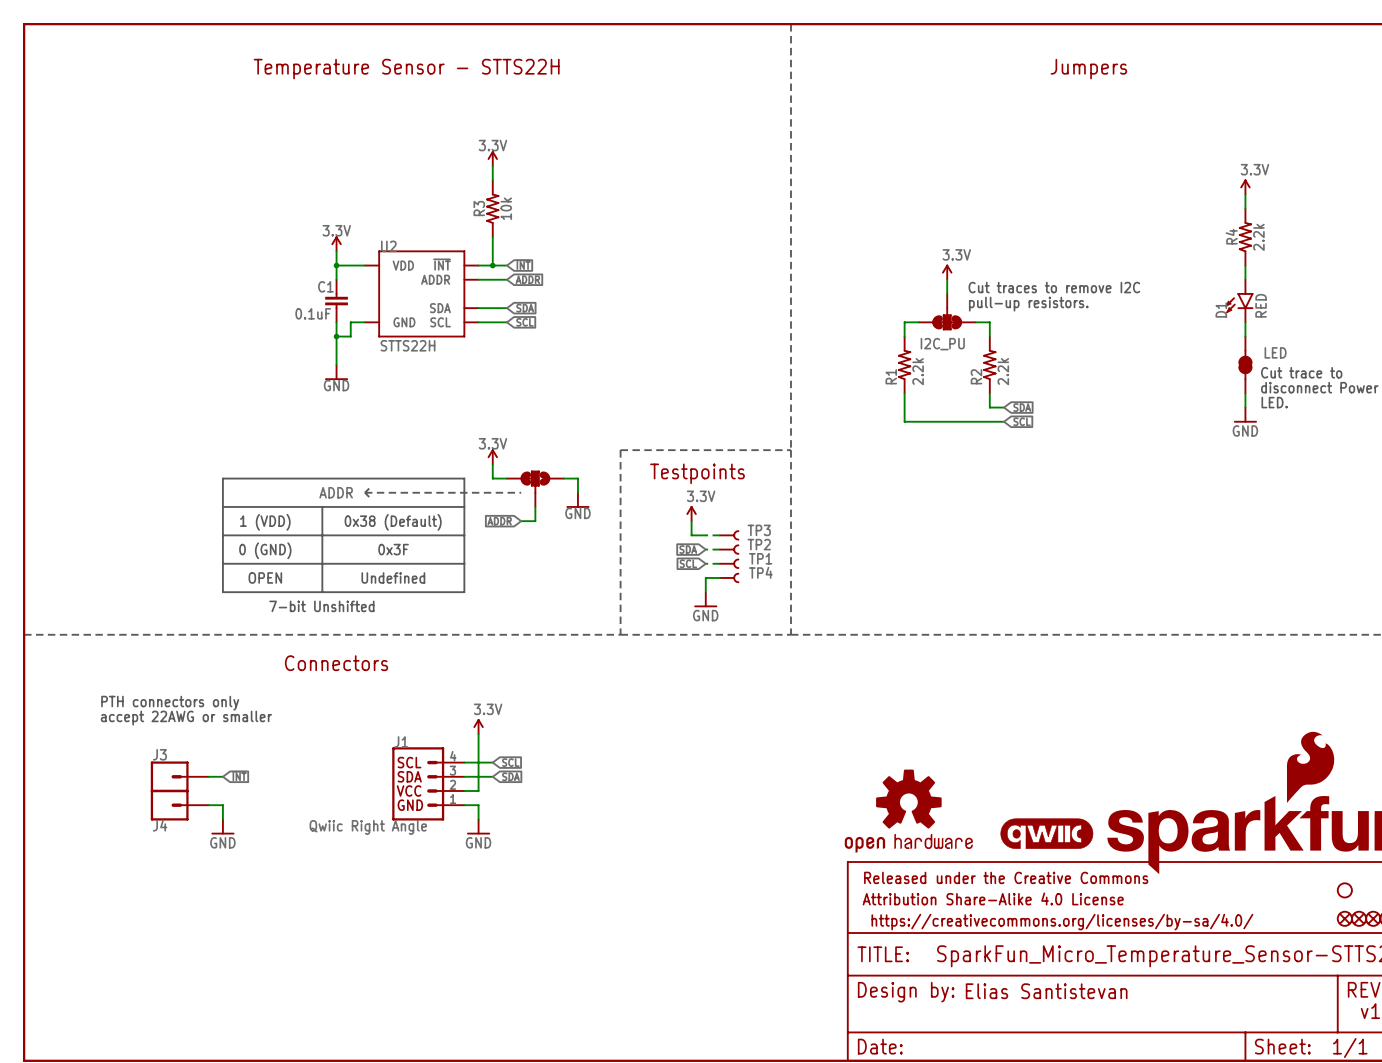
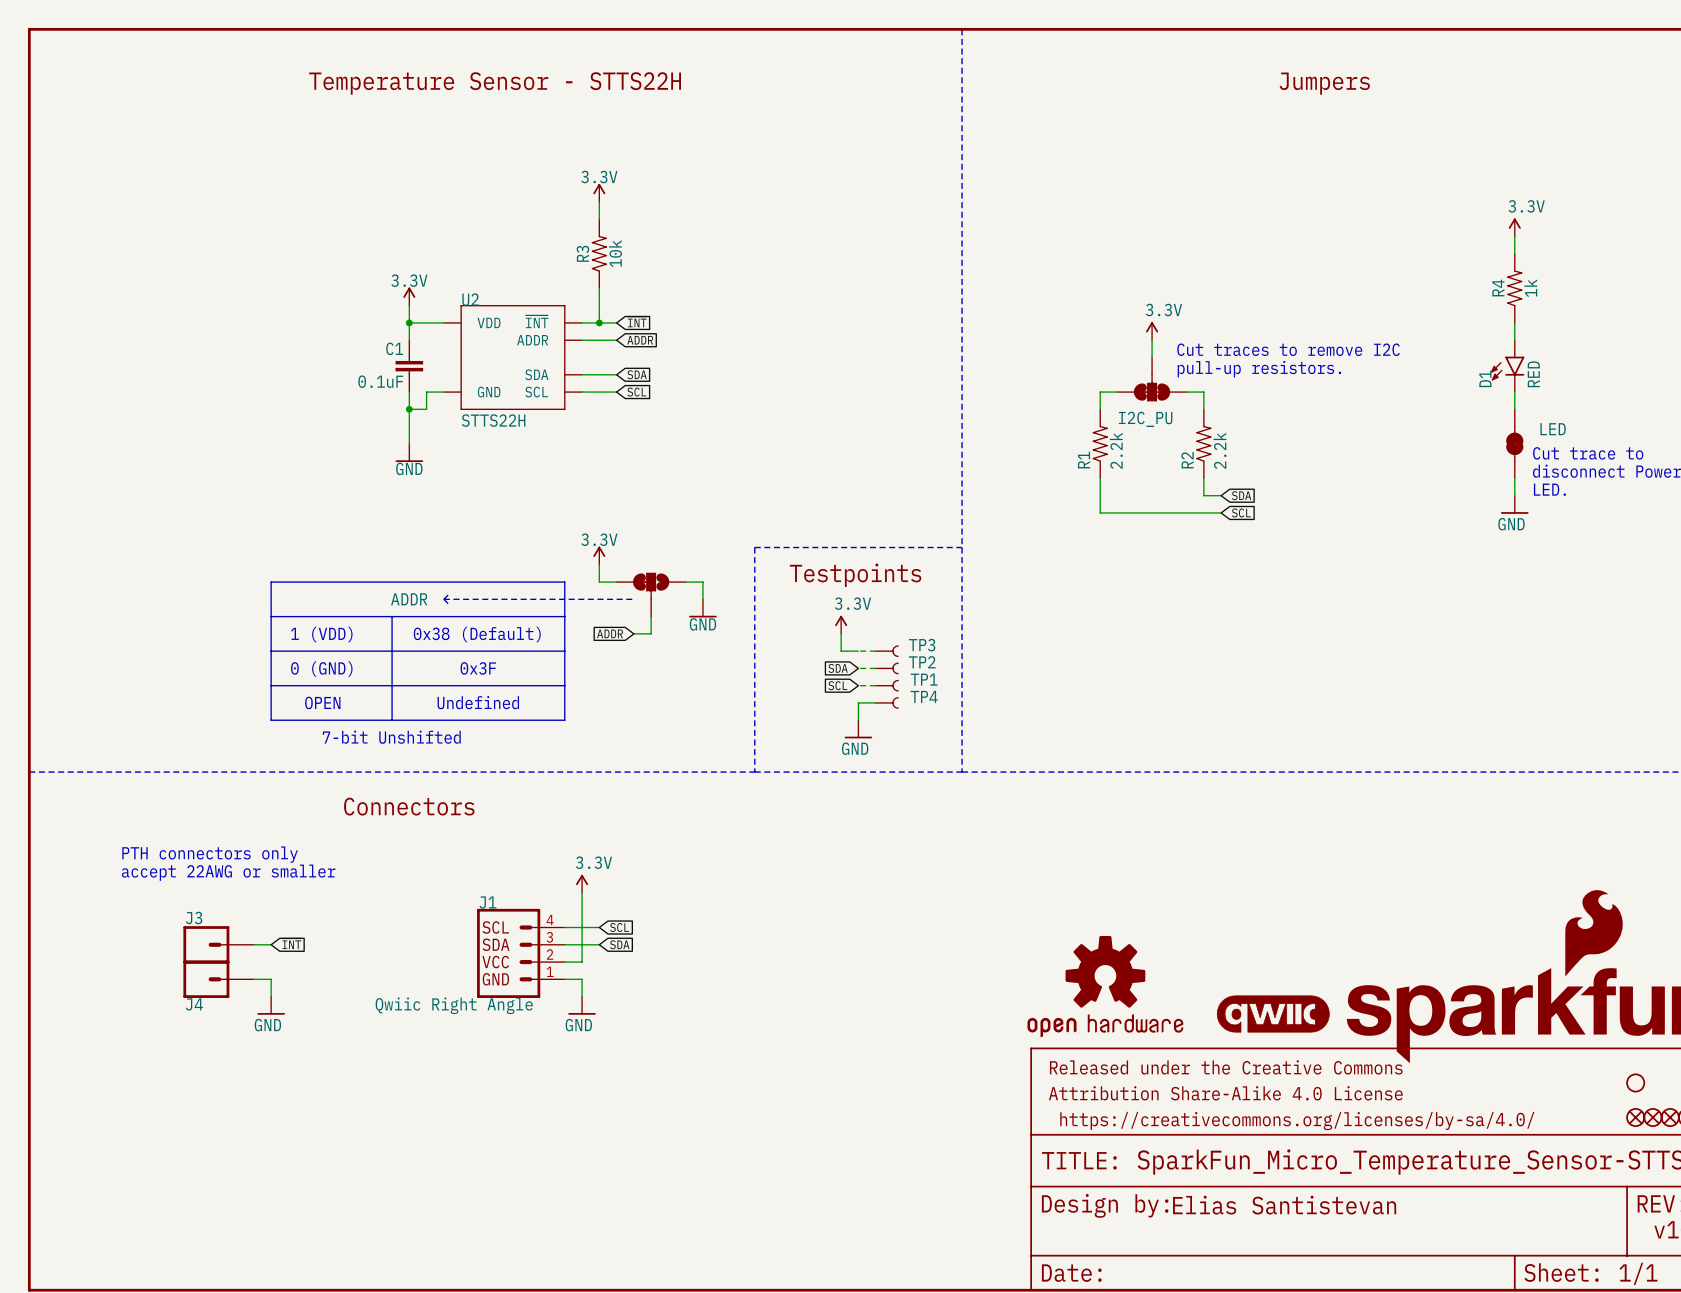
R4 value: 2.2k (1258, 237) -> 1k (1530, 288)

